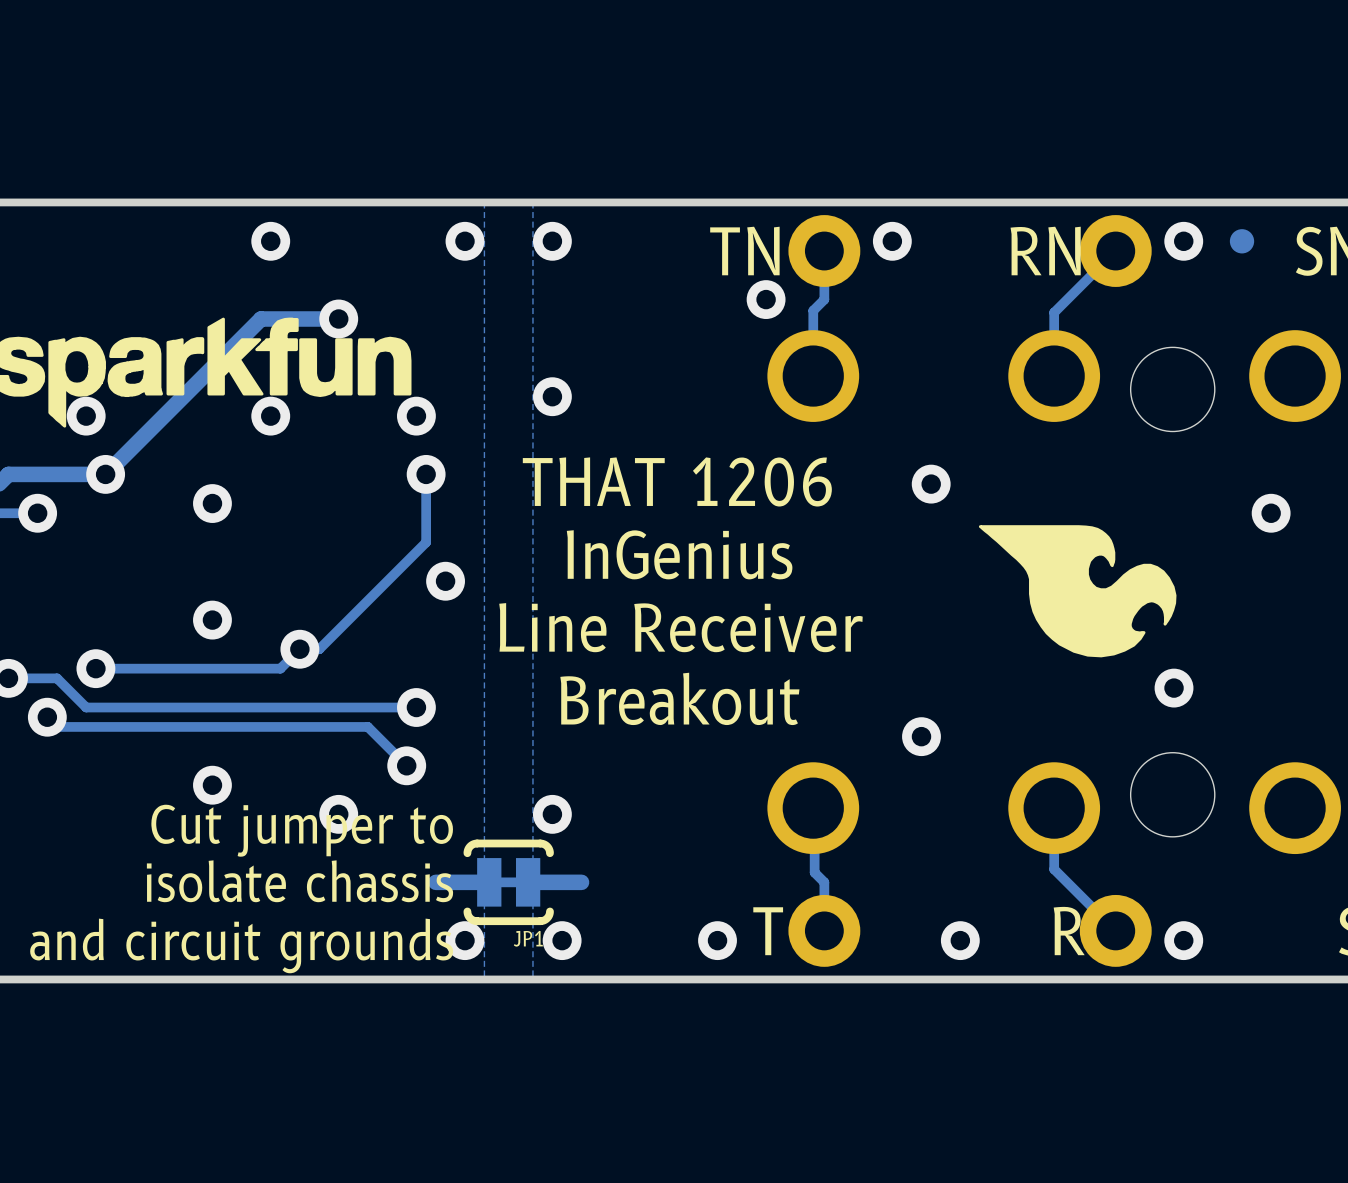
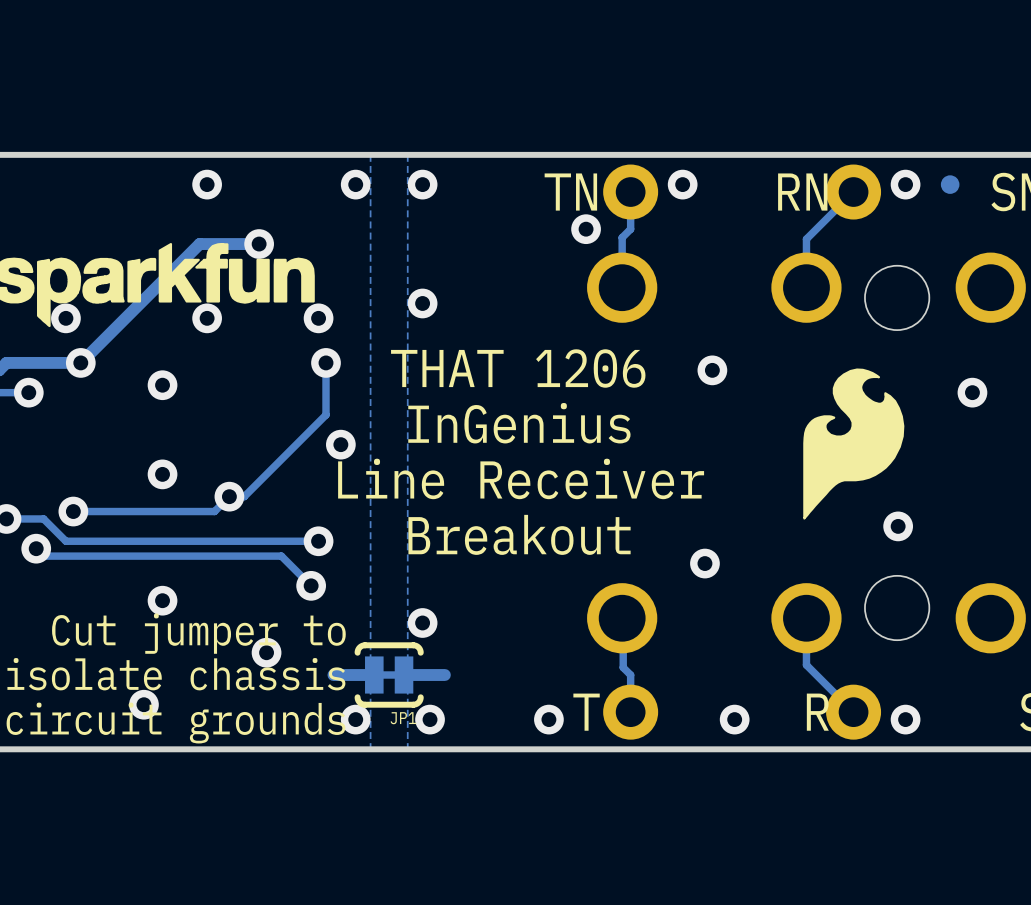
drawing: none -> [803, 368, 905, 520]
drawing: [978, 525, 1177, 658] -> none
via position: (338, 814) -> (266, 652)
via: none -> (143, 704)

